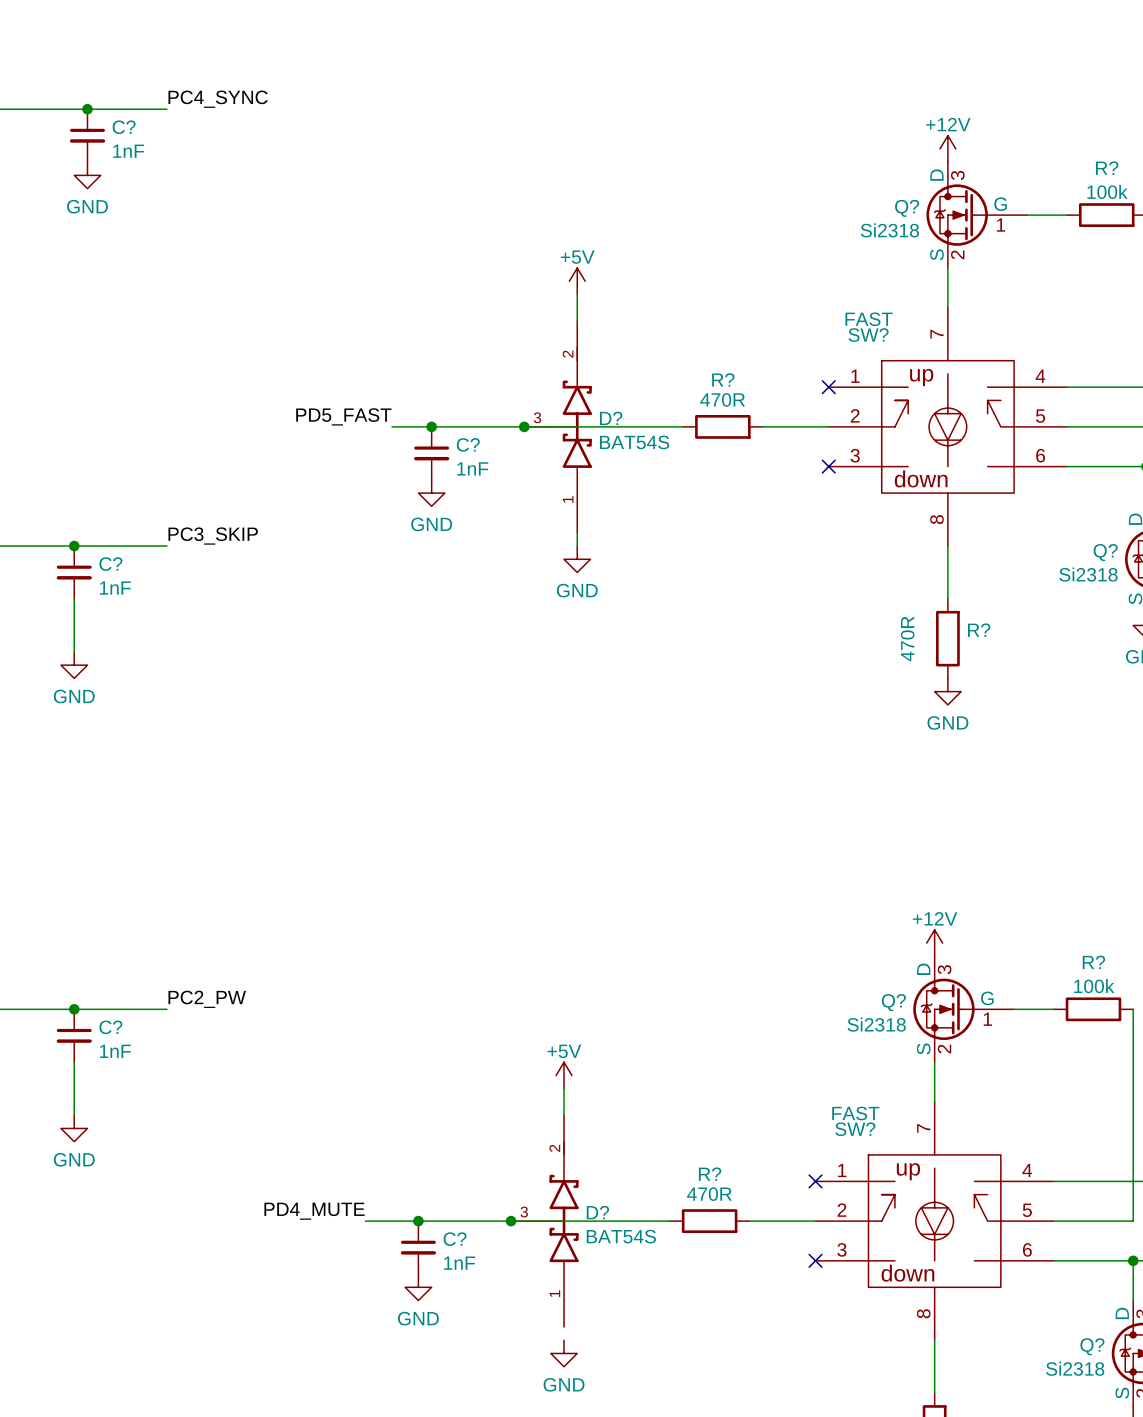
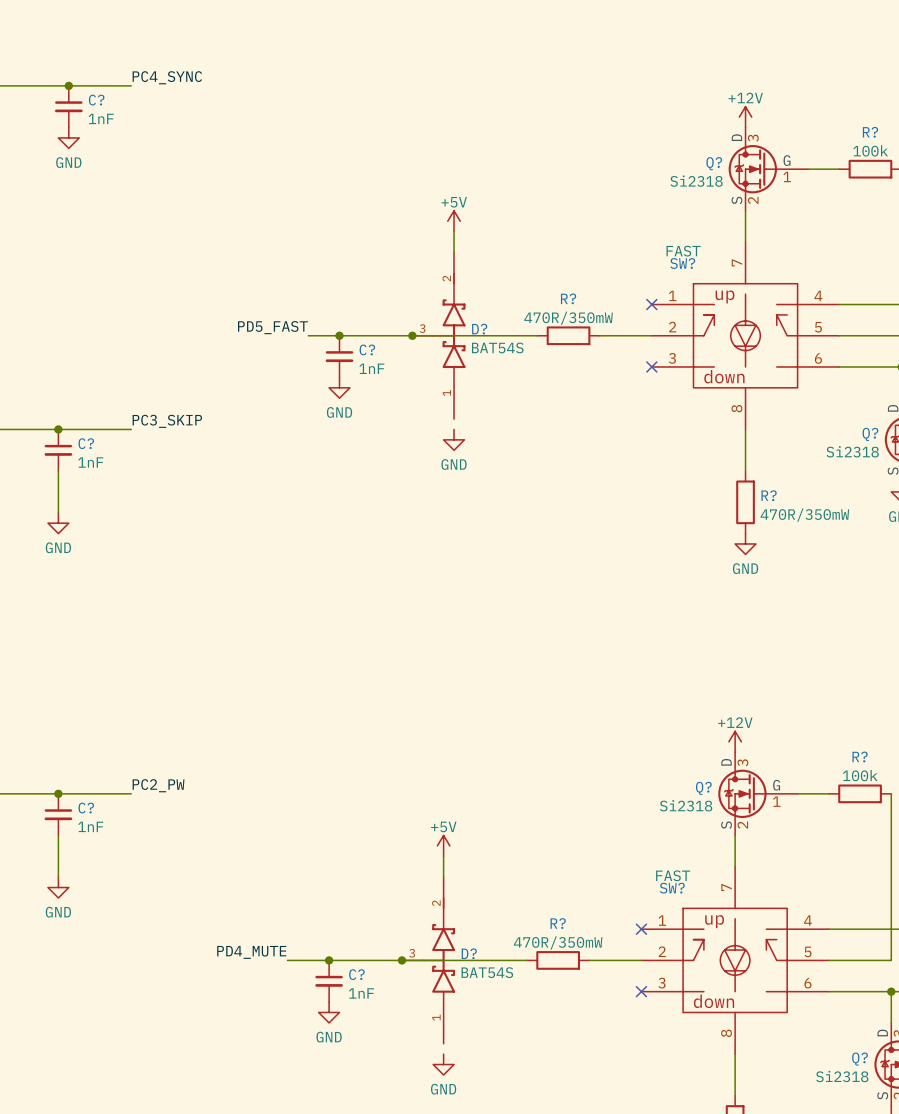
R? text: 470R (722, 399) -> 470R/350mW (568, 318)
wire: (577, 532) (577, 546) -> none
R? text: 470R (907, 638) -> 470R/350mW (804, 515)
R? text: 470R (709, 1194) -> 470R/350mW (558, 942)

